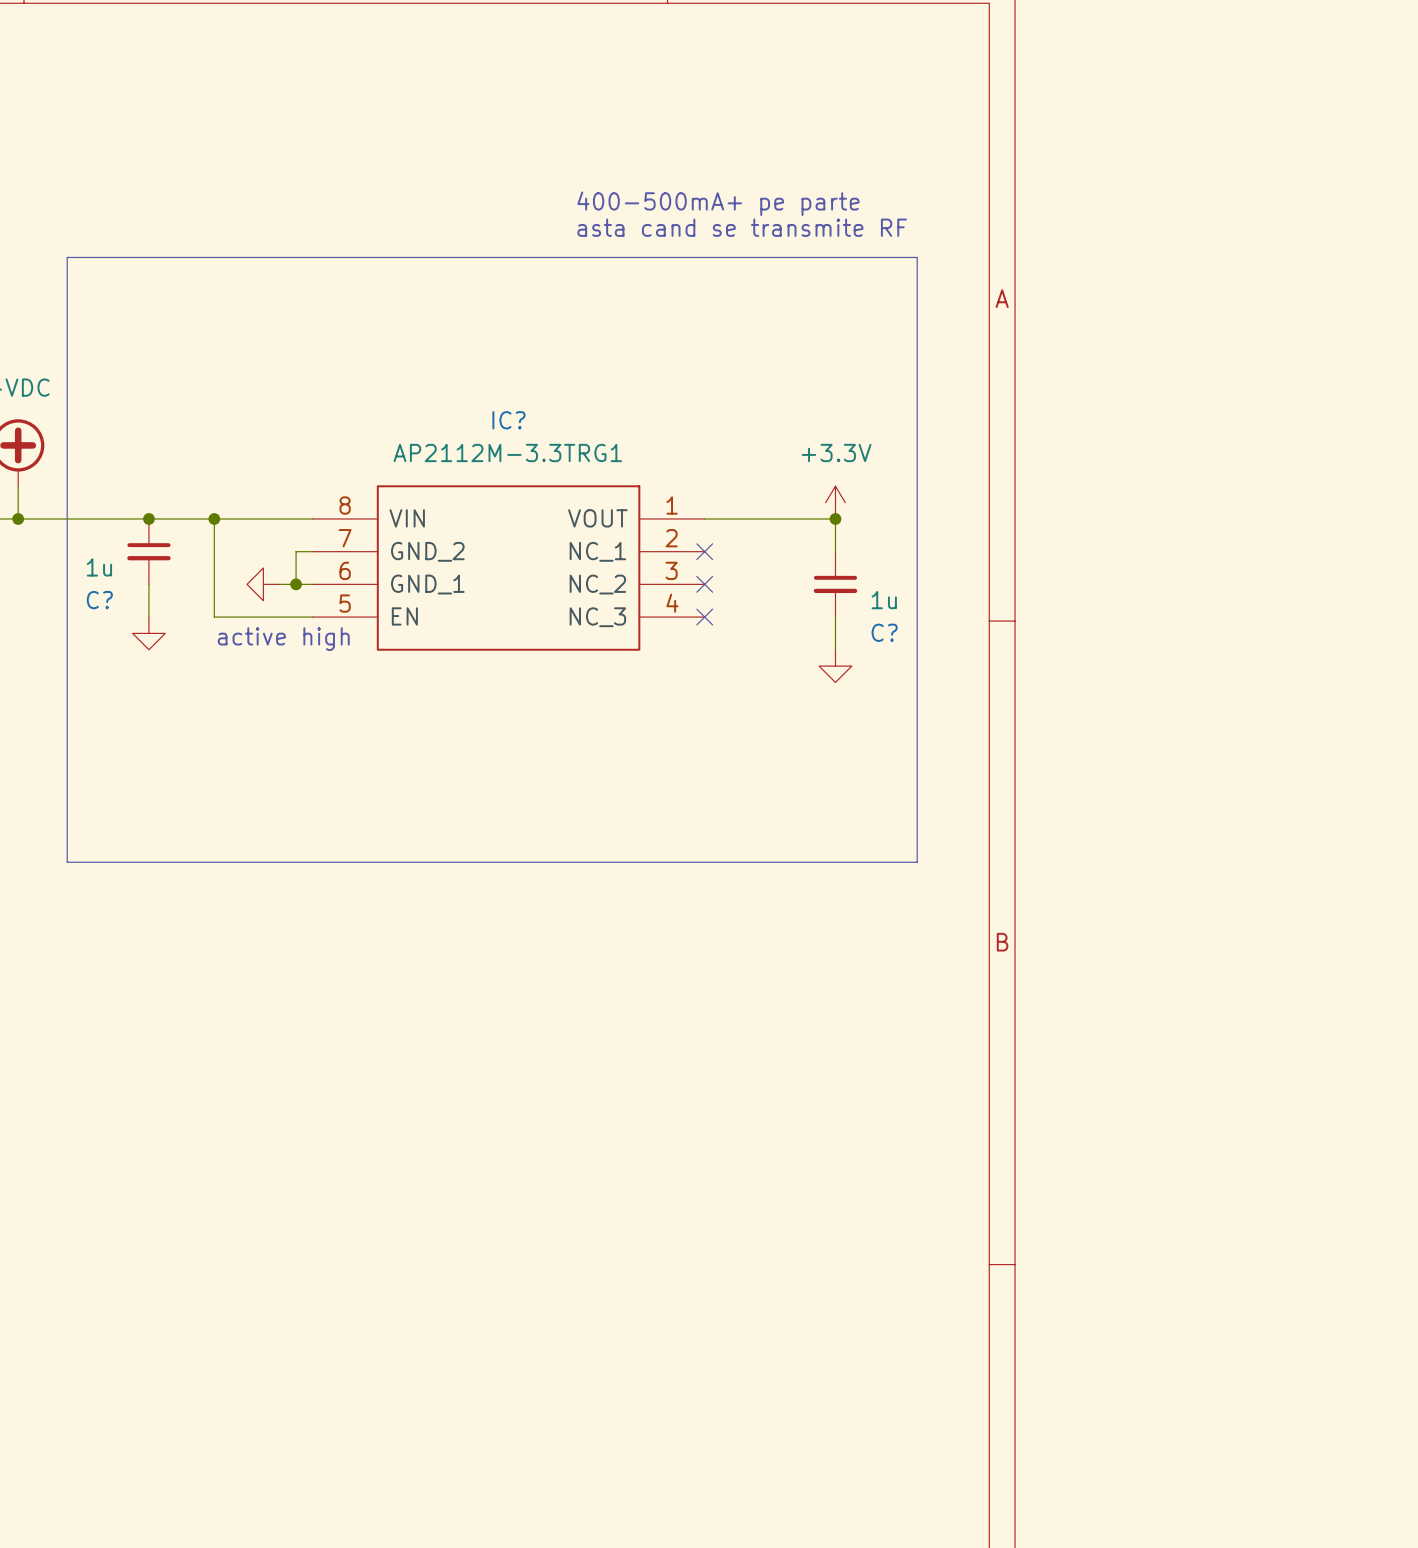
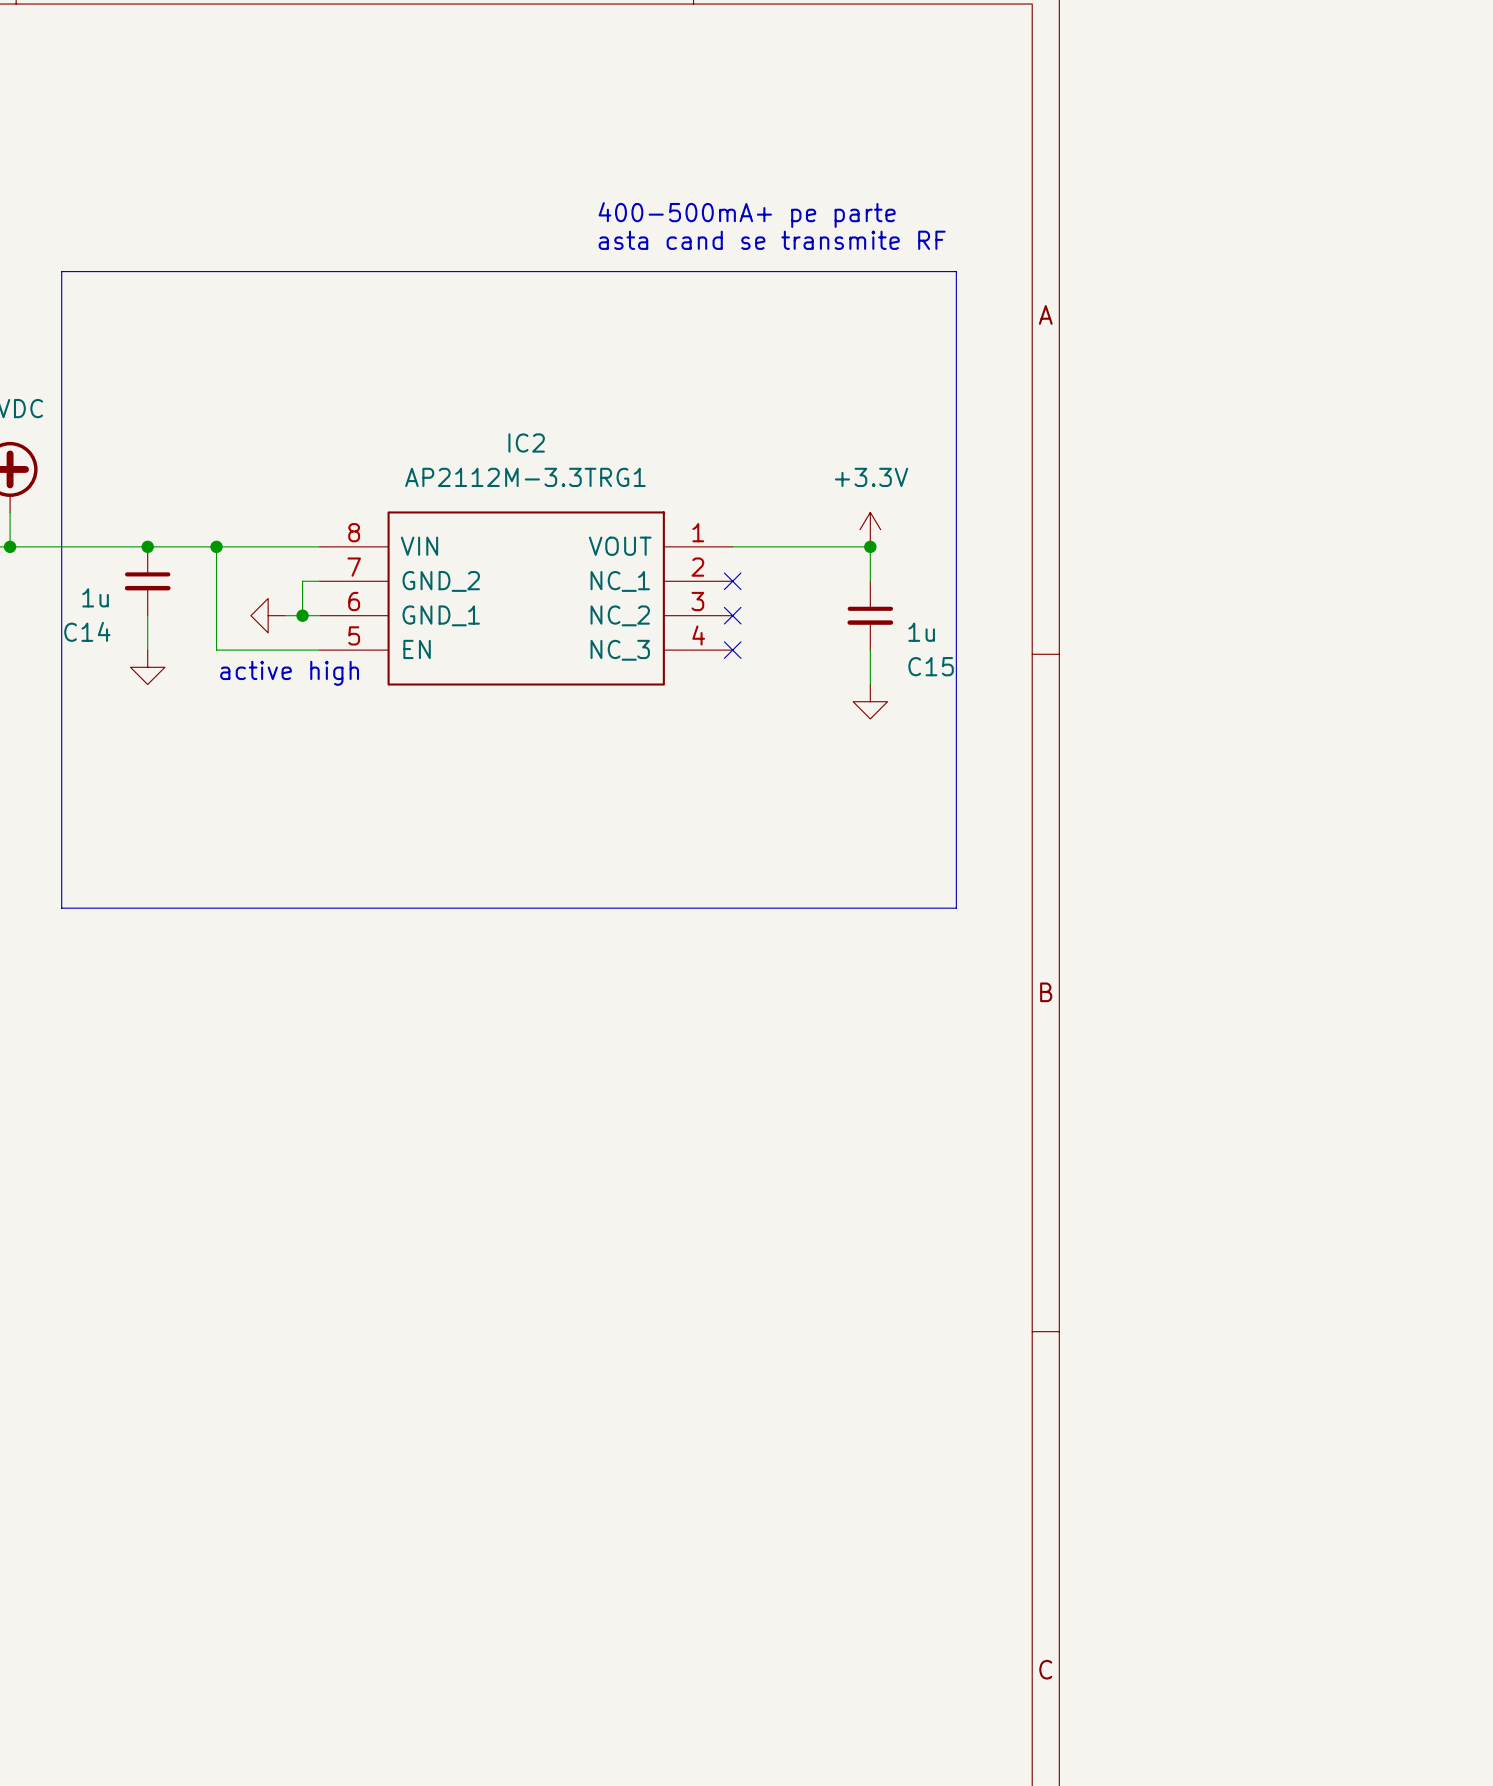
IC? name: IC? (508, 420) -> IC2 (526, 442)
C? name: C? (99, 600) -> C14 (87, 631)
C? name: C? (884, 632) -> C15 (931, 666)

